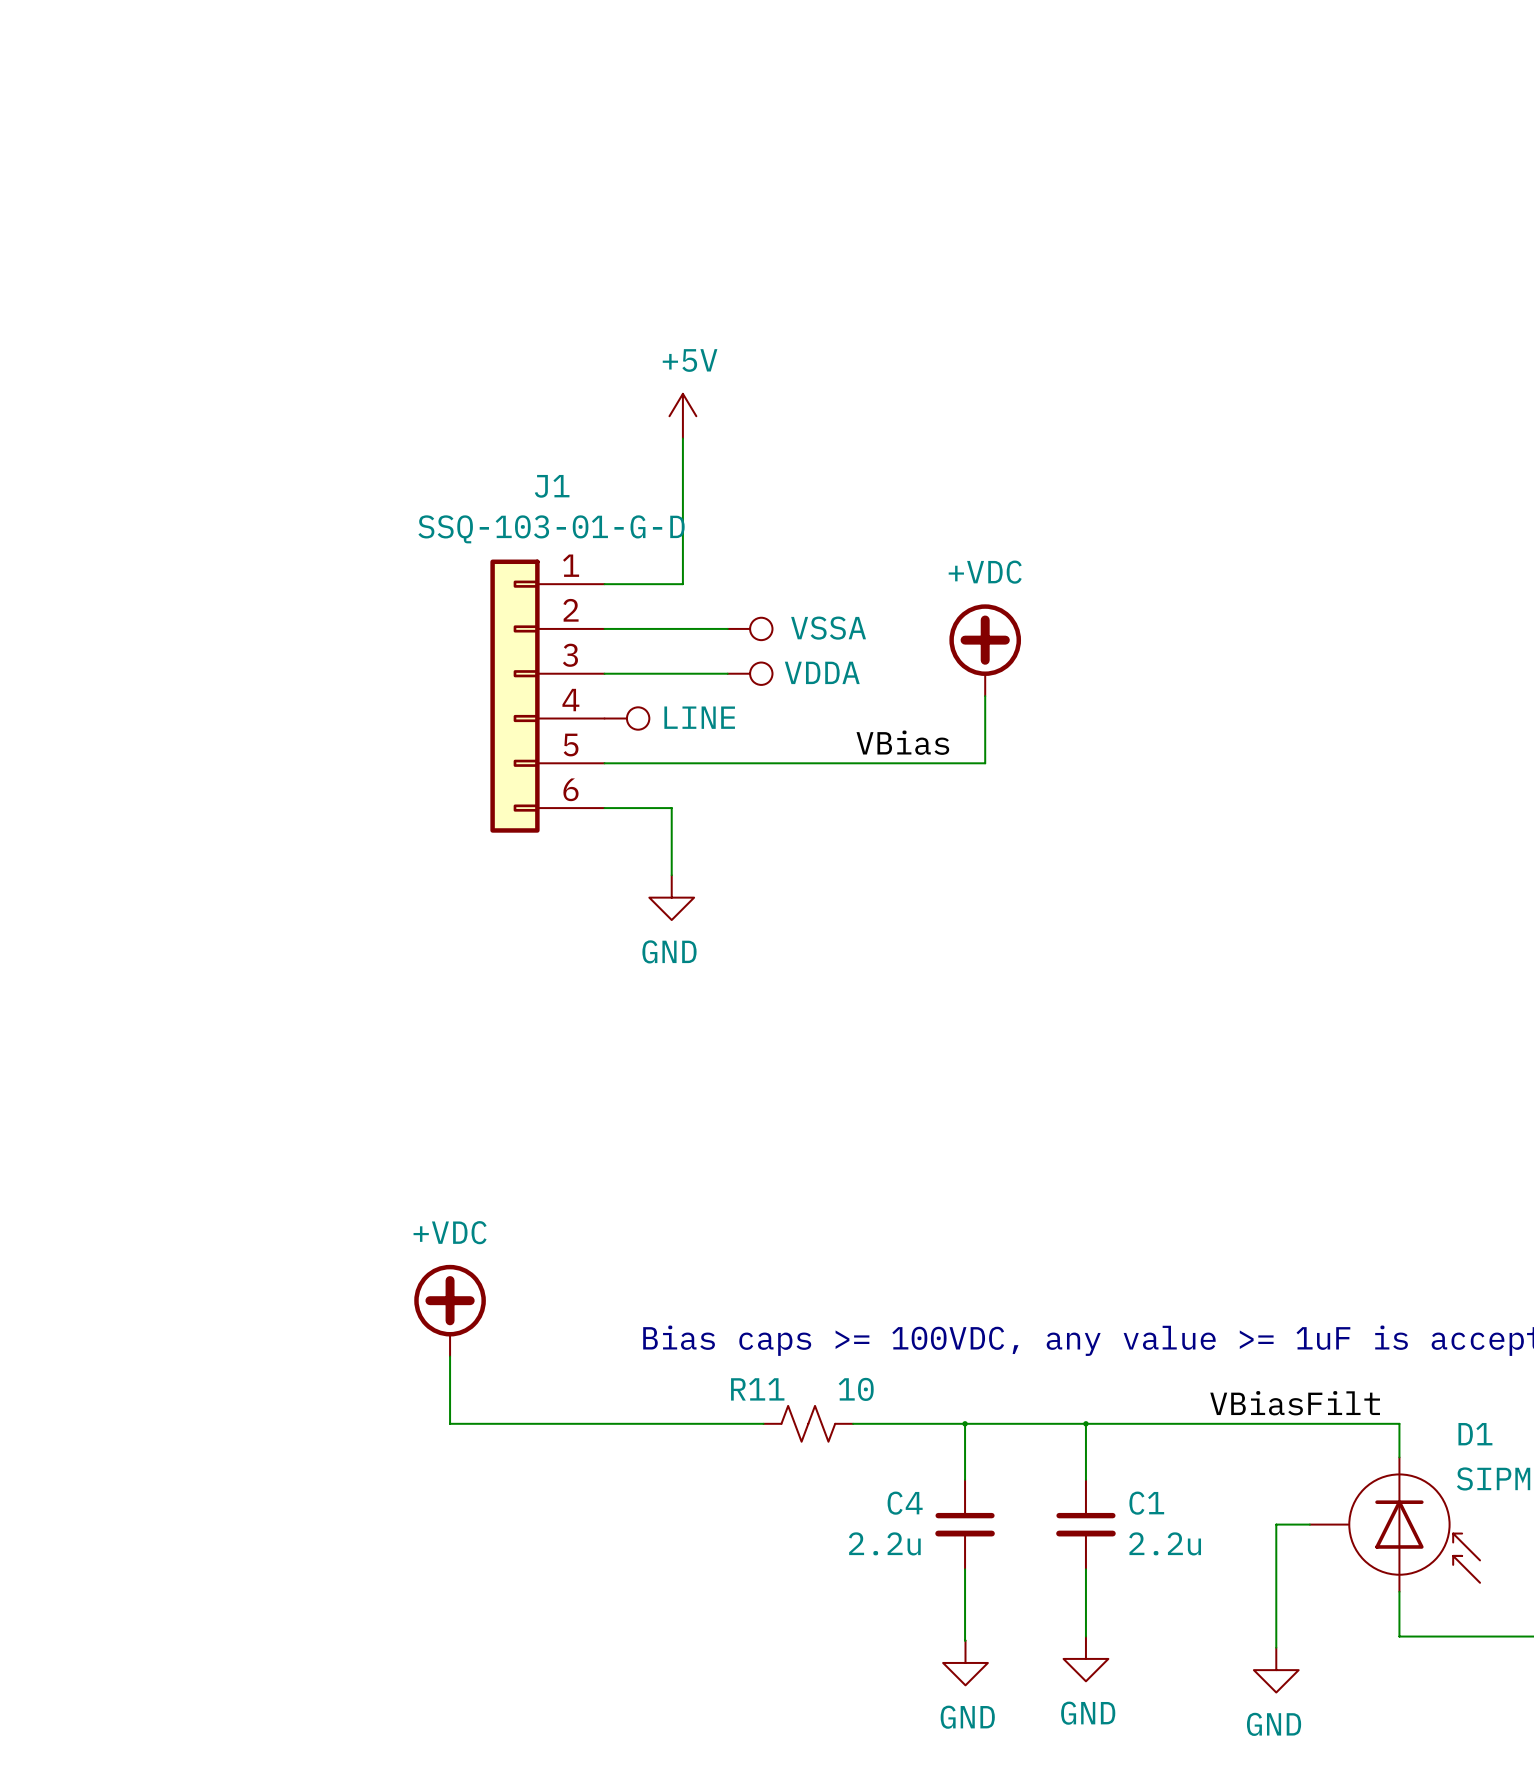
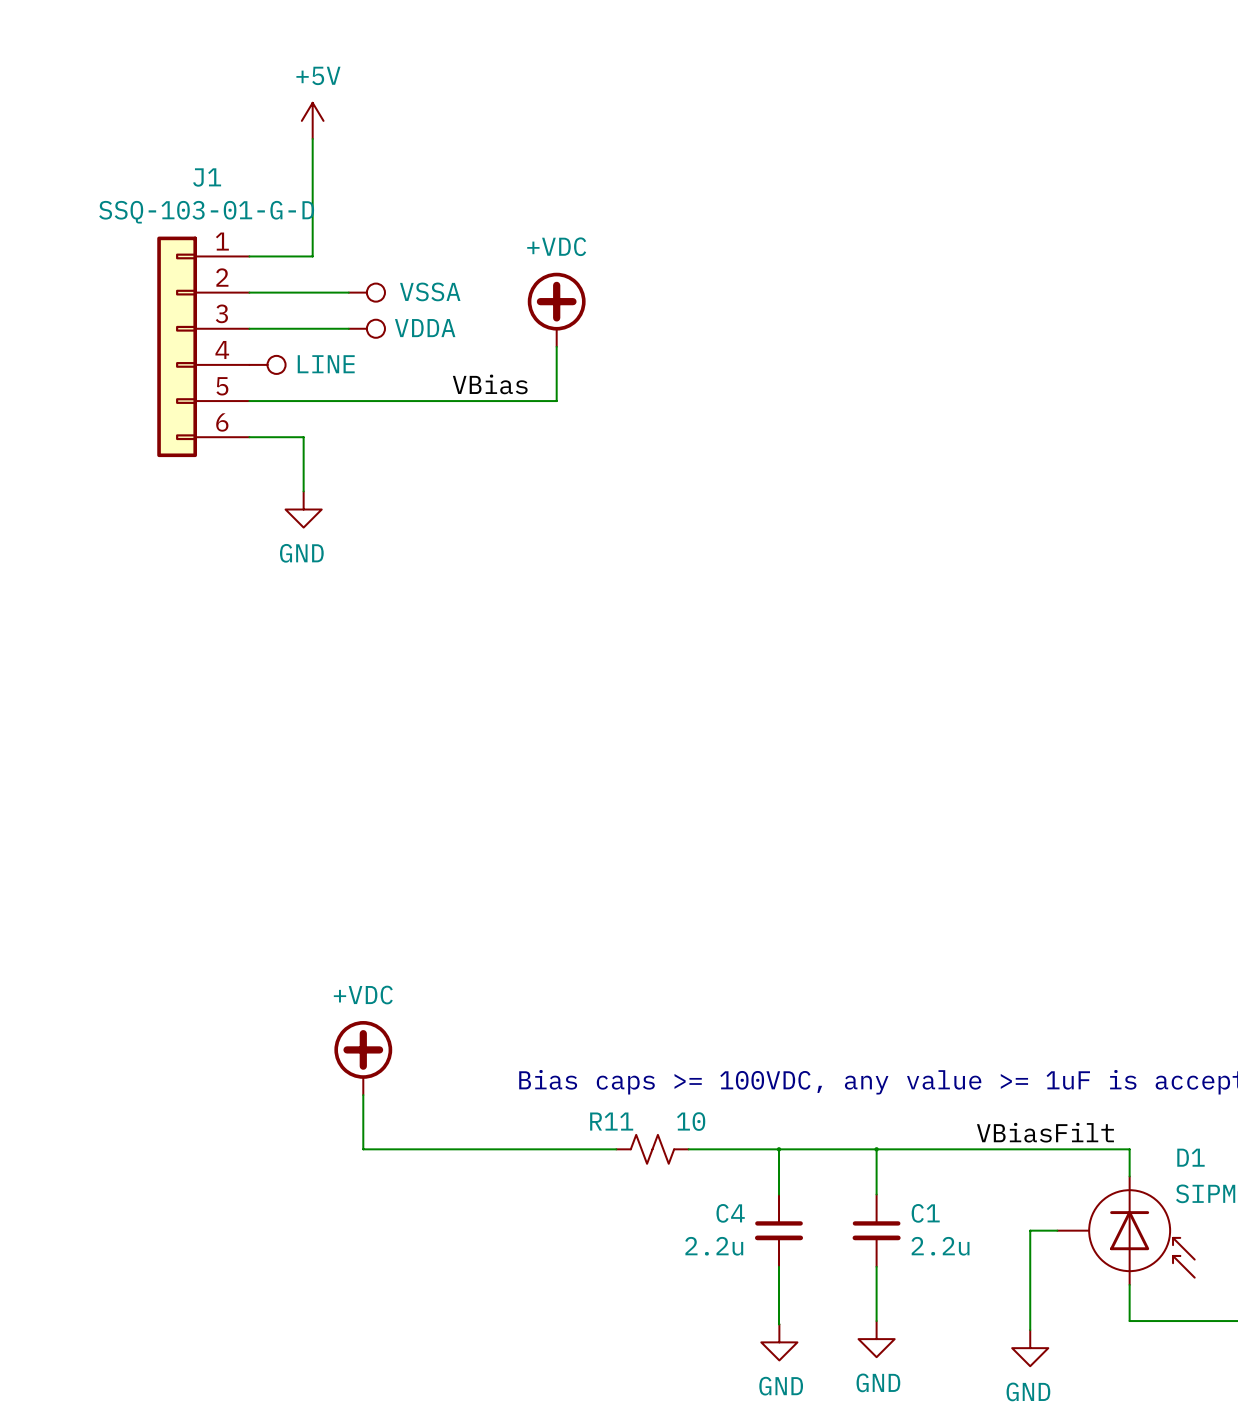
power symbol position: +5V (682, 416) -> +5V (312, 120)
wire: (682, 438) (682, 584) (604, 584) -> (312, 138) (312, 256) (249, 256)
wire: (604, 628) (727, 628) -> (249, 292) (348, 292)
power symbol position: VSSA (750, 628) -> VSSA (366, 292)
power symbol position: +VDC (985, 650) -> +VDC (556, 309)
wire: (604, 673) (727, 673) -> (249, 328) (348, 328)
power symbol position: VDDA (750, 673) -> VDDA (366, 328)
J1 position: (547, 696) -> (203, 346)
wire: (985, 696) (985, 763) (604, 763) -> (556, 346) (556, 401) (249, 401)
power symbol position: LINE (626, 718) -> LINE (267, 364)
label position: VBias (902, 742) -> VBias (490, 384)
wire: (604, 808) (671, 808) (671, 875) -> (249, 437) (303, 437) (303, 491)
power symbol position: GND (671, 897) -> GND (303, 509)

